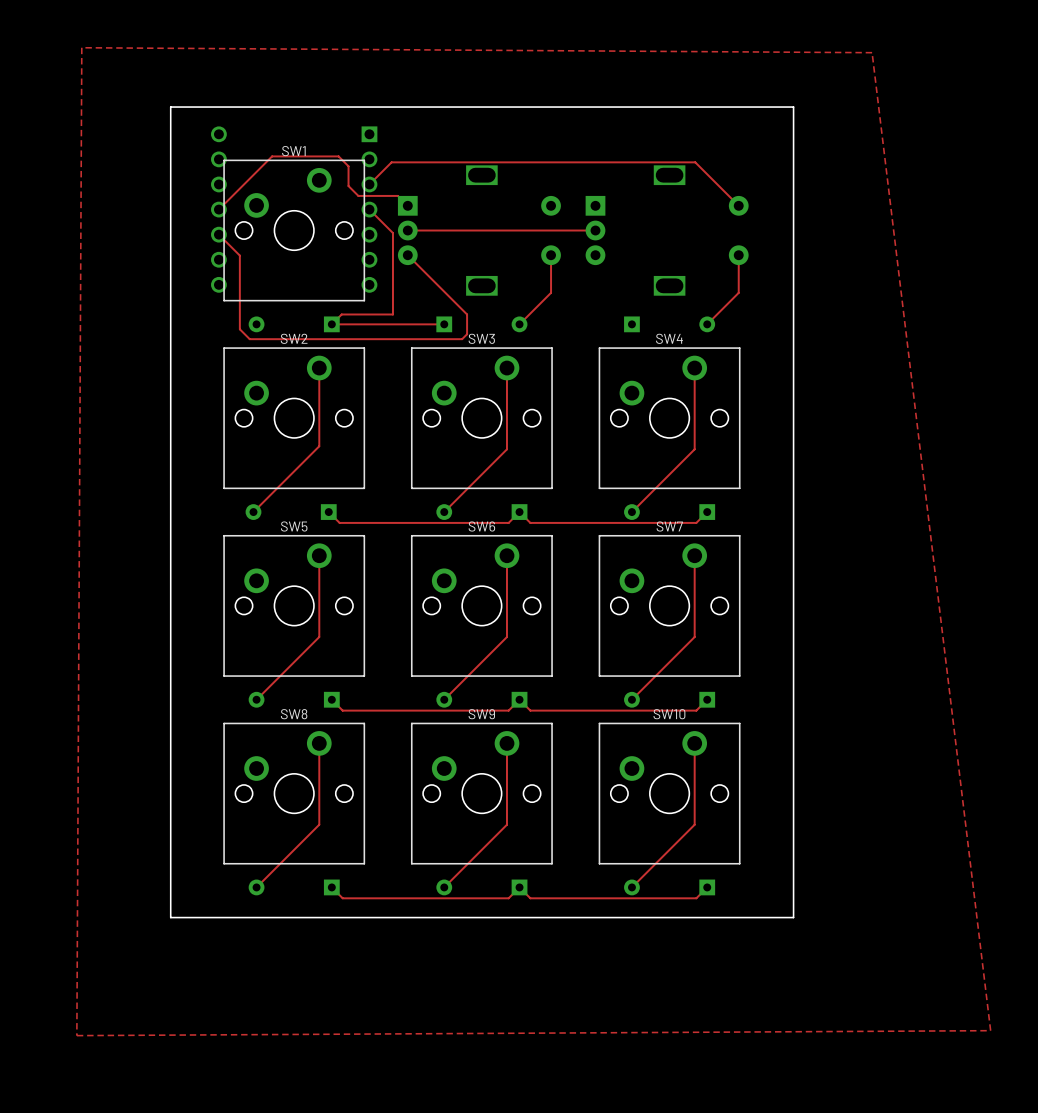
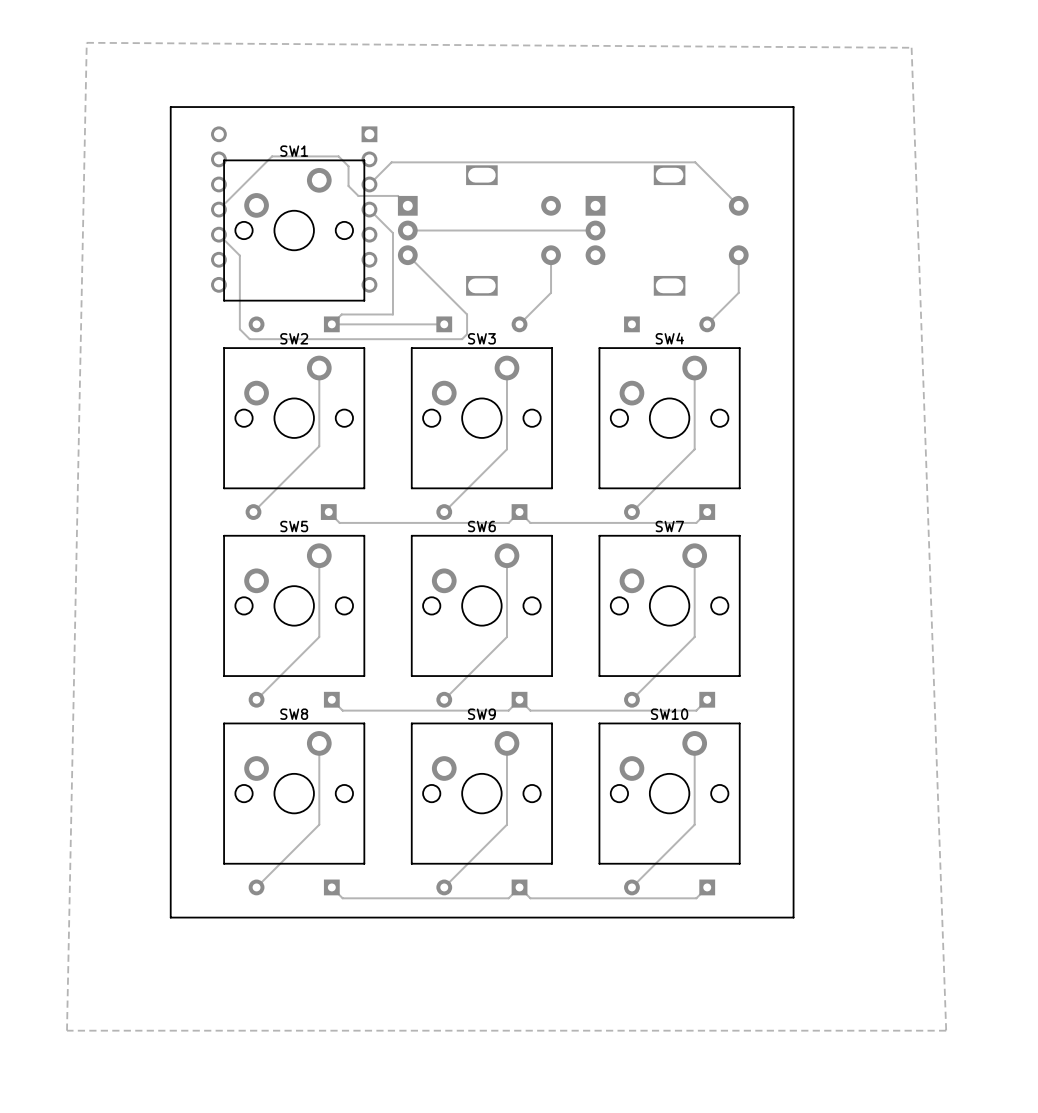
zone outline: (81, 47) (872, 52) (990, 1030) (76, 1035) (81, 47) -> (86, 42) (66, 1030) (946, 1030) (911, 47) (86, 42)

